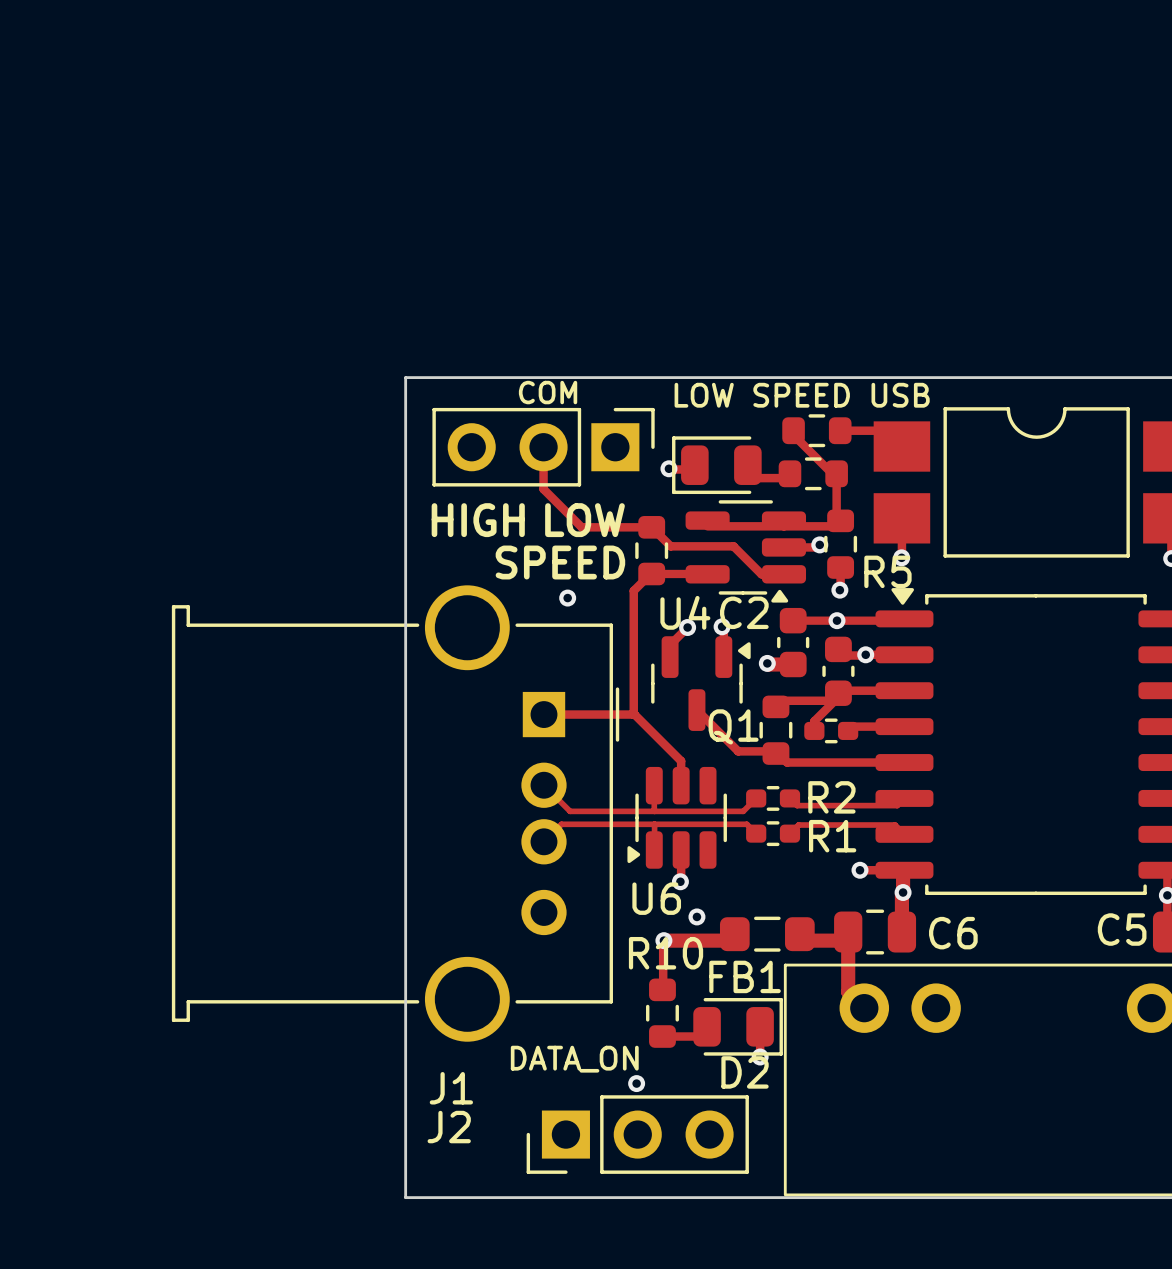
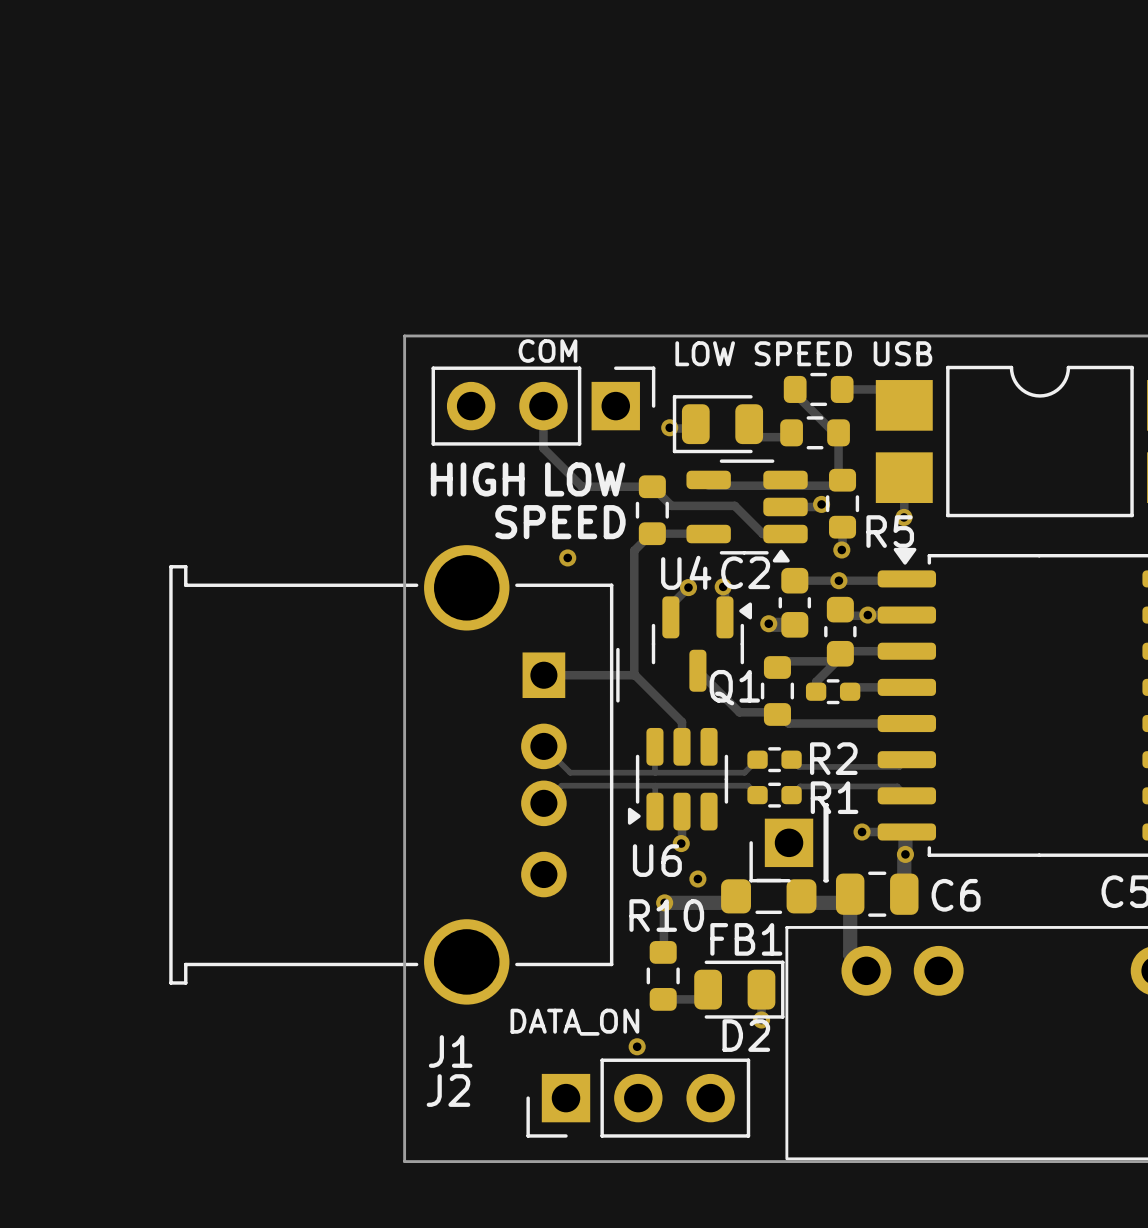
part: none -> (789, 842)

